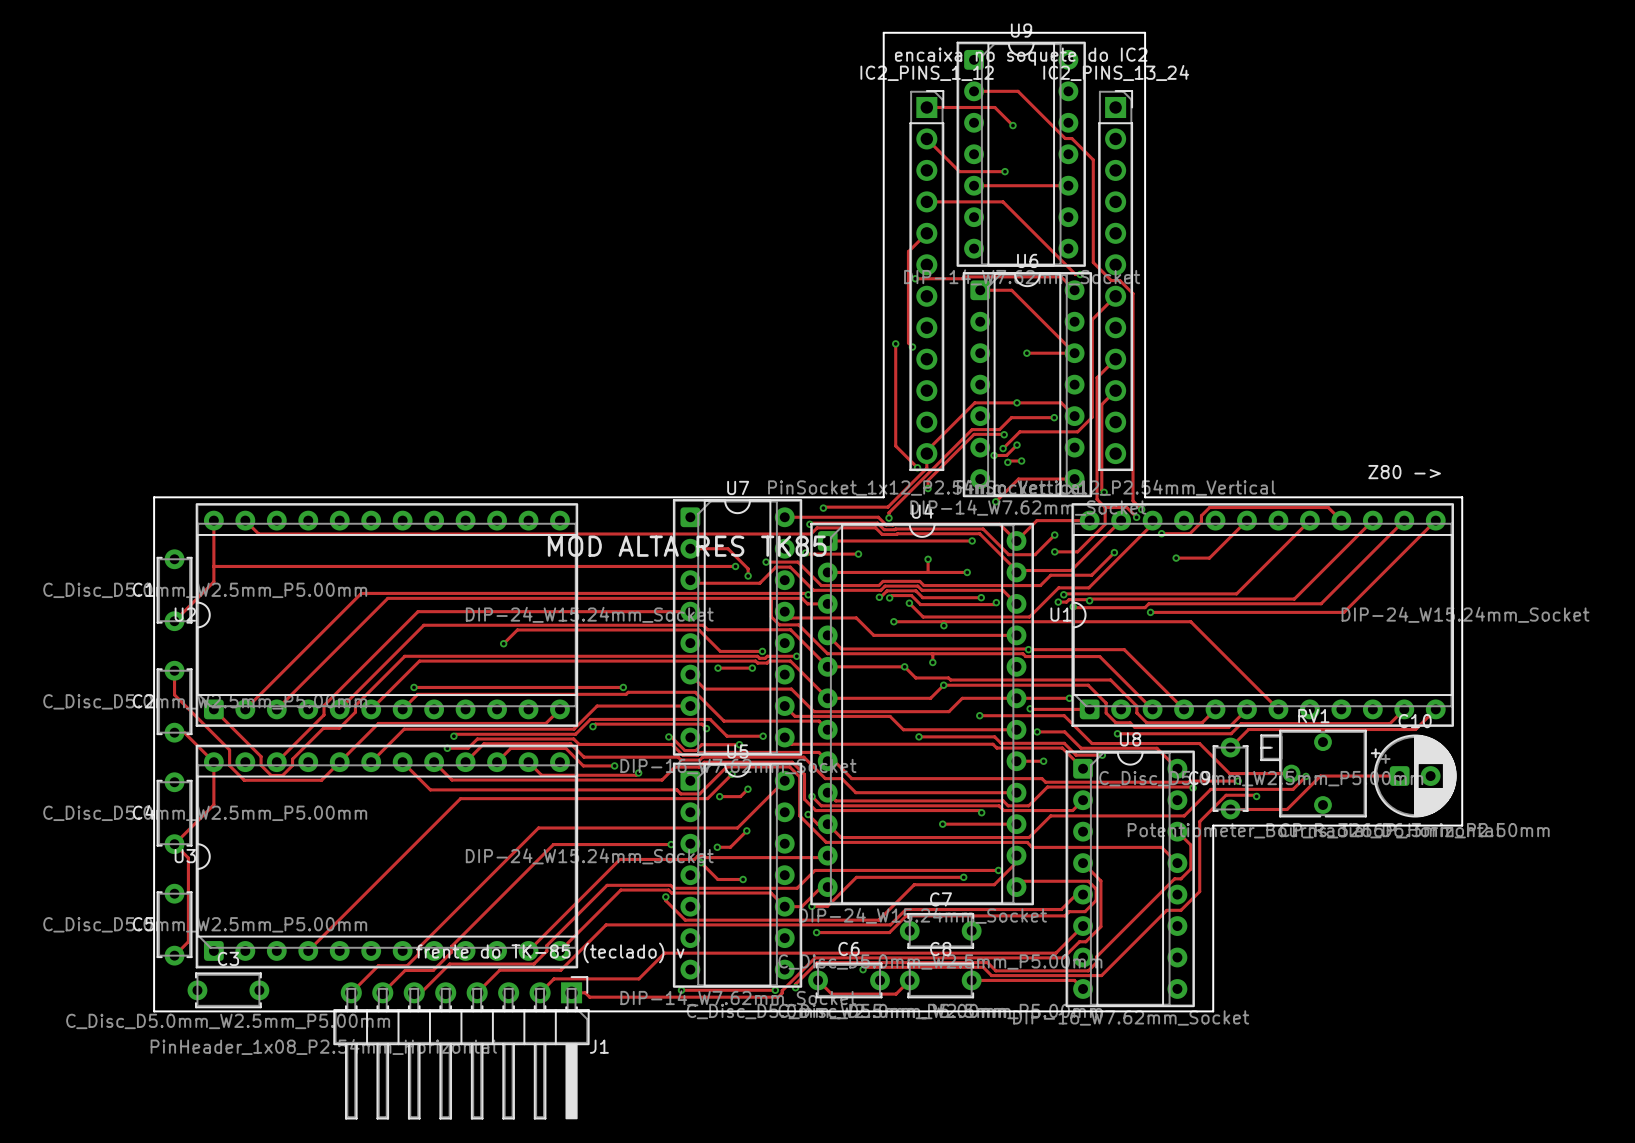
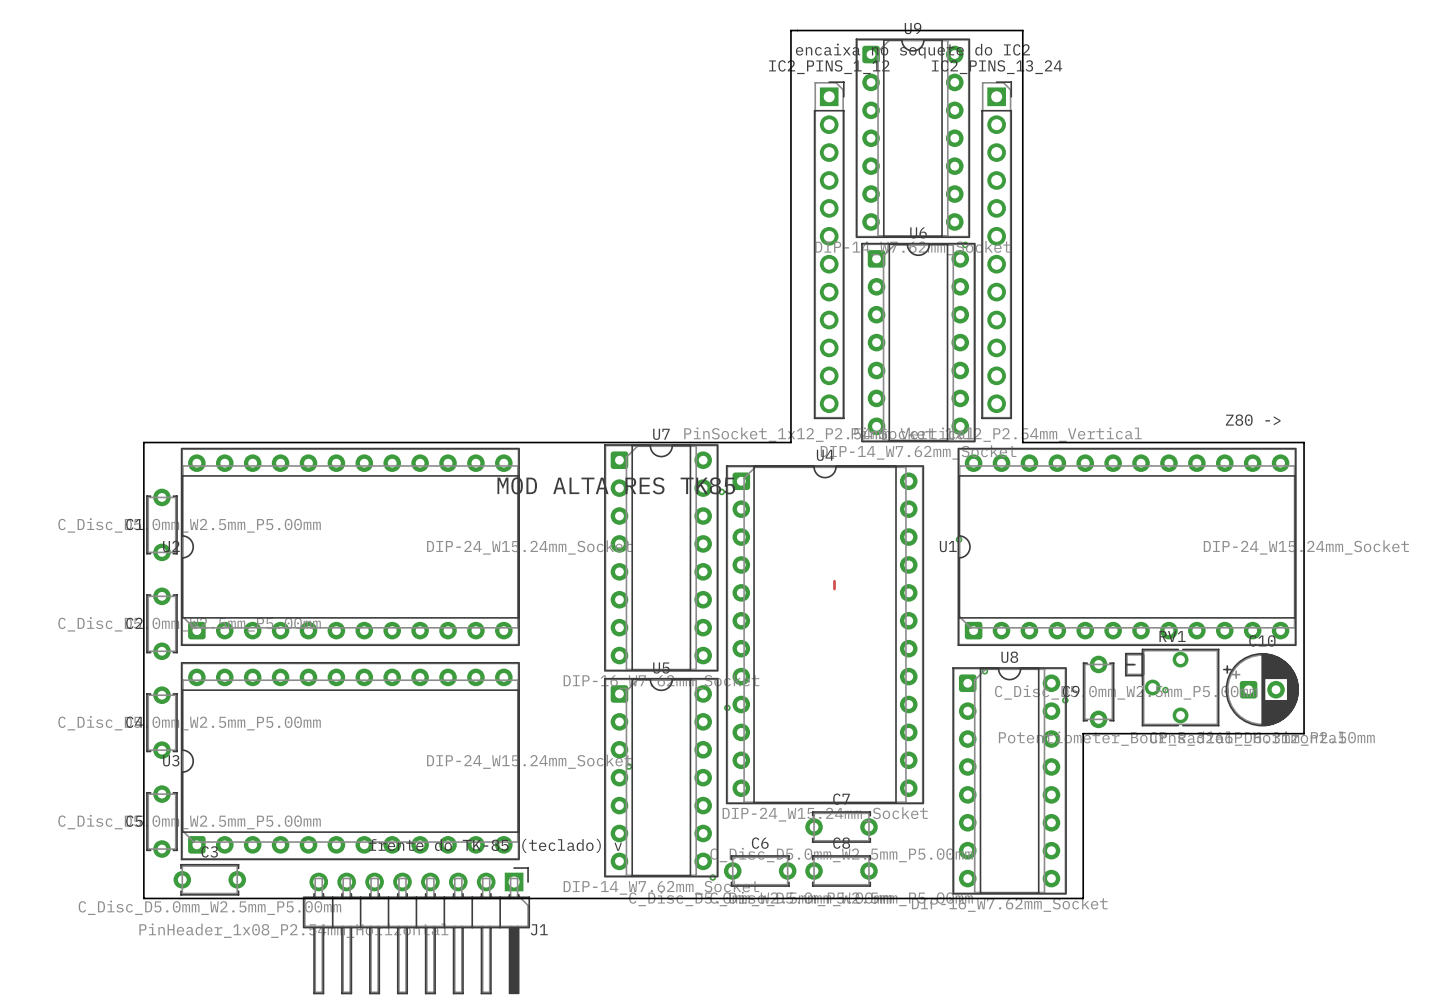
track: (974, 91) (1018, 91) (1065, 138) (1071, 138) (1093, 159) (1093, 262) (1111, 280) (1119, 280) (1133, 293) (1133, 500) (1141, 509) -> none
track: (926, 107) (994, 107) (1012, 125) -> none
via: (1012, 125) -> none
track: (926, 138) (959, 171) (1005, 171) -> none
via: (1005, 171) -> none
track: (974, 185) (1068, 185) -> none
track: (926, 201) (1003, 201) (1075, 274) (1080, 274) -> none
track: (926, 233) (908, 251) (908, 343) (912, 347) -> none
track: (915, 278) (1061, 276) (1074, 290) -> none
via: (915, 278) -> none
track: (980, 290) (1011, 290) (1074, 353) (1026, 353) -> none
track: (1115, 296) (1092, 319) (1092, 417) (1077, 431) (1019, 431) (1003, 448) -> none
track: (895, 343) (895, 445) (917, 467) -> none
via: (895, 343) -> none
via: (912, 347) -> none
via: (1026, 353) -> none
track: (1115, 359) (1097, 377) (1097, 499) (1105, 507) -> none
track: (1115, 390) (1101, 404) (1101, 489) (1104, 492) -> none
via: (1016, 402) -> none
track: (1074, 416) (1061, 402) (974, 402) (926, 450) (926, 468) (887, 507) (822, 507) -> none
track: (1054, 417) (1011, 417) (999, 429) (972, 429) (889, 512) (889, 518) -> none
via: (1054, 417) -> none
track: (1004, 434) (974, 434) (928, 480) (928, 488) -> none
via: (1004, 434) -> none
track: (1017, 445) (1006, 455) (994, 455) -> none
via: (1017, 445) -> none
via: (1003, 448) -> none
via: (994, 455) -> none
track: (1021, 461) (1007, 462) -> none
via: (1021, 461) -> none
via: (1007, 462) -> none
via: (917, 467) -> none
track: (1074, 479) (1018, 479) (995, 501) -> none
via: (928, 488) -> none
via: (1104, 492) -> none
via: (995, 501) -> none
track: (1105, 507) (1126, 507) (1136, 517) -> none
track: (1105, 507) (1105, 524) (1077, 551) (1054, 551) -> none
via: (823, 508) -> none
via: (1141, 509) -> none
track: (784, 517) (878, 517) (886, 525) (999, 524) (1016, 540) (1036, 520) (1089, 520) -> none
via: (1136, 517) -> none
via: (889, 518) -> none
track: (213, 520) (213, 581) (174, 621) -> none
track: (245, 520) (258, 534) (811, 534) (817, 527) (875, 527) (882, 534) (979, 533) (1016, 570) -> none
track: (1121, 520) (1071, 570) (1016, 570) -> none
track: (1152, 520) (1152, 524) (1088, 587) (1058, 587) (1029, 617) (923, 617) (909, 603) -> none
track: (1246, 520) (1209, 558) (1176, 558) -> none
track: (1309, 520) (1236, 593) (1063, 594) -> none
track: (1341, 520) (1328, 507) (1209, 507) (1201, 515) (1201, 522) (1189, 533) (1161, 533) -> none
track: (1372, 520) (1294, 599) (1089, 599) -> none
track: (1404, 520) (1321, 603) (1148, 603) (1144, 607) (1073, 606) -> none
track: (1435, 520) (1343, 612) (1150, 612) -> none
track: (809, 524) (877, 523) (884, 529) (983, 529) (1008, 554) (1035, 554) (1054, 535) -> none
via: (809, 524) -> none
via: (1161, 533) -> none
via: (1054, 535) -> none
track: (827, 540) (972, 540) -> none
via: (972, 540) -> none
track: (690, 548) (728, 548) (748, 568) (748, 576) -> none
via: (1054, 551) -> none
track: (1114, 552) (1091, 575) (1050, 575) (1040, 585) (923, 585) (919, 581) (883, 581) (878, 585) (821, 585) (797, 562) (766, 562) -> none
via: (1114, 552) -> none
track: (805, 553) (858, 554) -> none
via: (858, 554) -> none
via: (1176, 558) -> none
track: (928, 559) (928, 572) -> none
via: (928, 559) -> none
via: (766, 562) -> none
track: (213, 566) (735, 566) -> none
via: (735, 566) -> none
track: (827, 572) (967, 572) -> none
via: (967, 572) -> none
via: (748, 576) -> none
track: (690, 580) (693, 583) (759, 583) (775, 567) (790, 567) (813, 590) (880, 590) (885, 586) (917, 586) (922, 590) (1002, 590) (1016, 603) -> none
track: (808, 594) (361, 593) (245, 709) -> none
via: (808, 594) -> none
via: (1063, 594) -> none
track: (879, 597) (887, 590) (915, 590) (922, 597) (981, 597) -> none
via: (879, 597) -> none
track: (889, 597) (892, 595) (911, 595) (920, 604) (994, 604) (996, 602) -> none
via: (889, 597) -> none
via: (981, 597) -> none
track: (771, 598) (771, 616) (779, 624) (798, 624) (827, 653) (1022, 653) (1025, 656) (1099, 656) (1152, 709) -> none
track: (1089, 599) (1069, 599) (1066, 602) (1058, 602) -> none
via: (1089, 600) -> none
via: (996, 602) -> none
via: (1058, 602) -> none
track: (827, 603) (807, 603) (802, 598) (387, 598) (276, 709) -> none
via: (909, 603) -> none
track: (690, 611) (417, 611) (324, 705) (324, 714) (276, 762) -> none
track: (784, 611) (791, 617) (856, 617) (873, 635) (1016, 635) -> none
via: (1150, 612) -> none
track: (893, 621) (1190, 621) (1278, 709) -> none
via: (893, 621) -> none
via: (943, 625) -> none
track: (827, 635) (841, 649) (1124, 649) (1184, 709) -> none
track: (503, 643) (517, 629) (698, 629) (720, 651) (762, 651) -> none
via: (503, 643) -> none
via: (1028, 649) -> none
via: (762, 651) -> none
track: (796, 656) (767, 656) (765, 658) (757, 656) (404, 656) (355, 705) (355, 712) (339, 728) (323, 728) (292, 759) (292, 765) (282, 775) (271, 775) (261, 765) (261, 756) (213, 709) -> none
via: (796, 656) -> none
via: (932, 662) -> none
via: (904, 666) -> none
track: (718, 668) (752, 668) -> none
via: (718, 668) -> none
via: (752, 668) -> none
track: (174, 670) (174, 694) (229, 750) (229, 765) (244, 780) (321, 780) (378, 723) (545, 723) (559, 709) -> none
track: (690, 674) (704, 689) (791, 689) (814, 711) (948, 711) (962, 698) (1069, 698) -> none
via: (943, 685) -> none
track: (414, 687) (623, 687) -> none
via: (414, 687) -> none
via: (623, 687) -> none
via: (1069, 698) -> none
track: (690, 706) (597, 706) (574, 729) (404, 729) (371, 762) -> none
track: (784, 706) (795, 716) (890, 716) (903, 729) (1016, 729) -> none
track: (1030, 708) (1089, 709) -> none
via: (1030, 708) -> none
track: (339, 709) (423, 625) (703, 625) (707, 629) (790, 629) (827, 666) (904, 666) (915, 677) (948, 677) (950, 680) (1110, 680) (1136, 706) (1136, 712) (1146, 722) (1202, 722) (1215, 709) -> none
track: (371, 709) (419, 661) (755, 661) (757, 663) (790, 661) (827, 698) (930, 698) (943, 685) (1088, 685) (1106, 703) (1106, 713) (1115, 722) (1130, 722) (1134, 727) (1228, 727) (1246, 709) -> none
track: (402, 709) (417, 694) (626, 694) (628, 692) (695, 692) (724, 721) (819, 721) (827, 729) -> none
track: (1404, 709) (1390, 723) (1241, 723) (1231, 733) (1117, 733) -> none
track: (1435, 709) (1415, 729) (1248, 729) (1230, 747) -> none
track: (979, 715) (1064, 715) (1092, 743) (1199, 743) (1229, 773) (1291, 773) -> none
via: (979, 715) -> none
track: (592, 726) (595, 724) (702, 724) (706, 728) -> none
via: (592, 726) -> none
via: (706, 728) -> none
track: (1037, 731) (1064, 731) (1081, 748) (1156, 748) (1177, 768) -> none
via: (1037, 731) -> none
track: (174, 732) (184, 732) (213, 762) (213, 804) (174, 844) (188, 858) (188, 941) (174, 955) -> none
via: (1117, 733) -> none
track: (453, 736) (455, 734) (575, 734) (590, 719) (710, 719) (727, 736) (763, 736) -> none
via: (453, 736) -> none
track: (668, 736) (671, 736) (684, 750) (695, 750) (701, 744) (739, 744) -> none
via: (668, 736) -> none
via: (763, 736) -> none
track: (918, 736) (994, 736) (1001, 743) (1064, 743) (1076, 755) (1102, 755) -> none
via: (918, 736) -> none
track: (784, 737) (791, 744) (993, 744) (996, 748) (1062, 748) (1083, 768) -> none
via: (739, 744) -> none
track: (447, 748) (468, 748) (477, 739) (573, 739) (579, 744) (672, 744) (682, 755) (697, 755) (700, 752) (818, 752) (827, 761) (834, 761) (851, 778) (1041, 778) (1045, 782) (1238, 781) -> none
via: (447, 748) -> none
track: (1016, 761) (1043, 761) -> none
via: (1043, 761) -> none
track: (402, 762) (430, 789) (676, 789) (680, 793) (699, 793) (726, 766) (789, 766) (799, 776) (799, 815) (826, 842) (1027, 842) (1032, 847) (1161, 847) (1177, 863) -> none
track: (434, 762) (451, 780) (662, 780) (674, 767) (699, 767) (704, 762) (792, 762) (804, 774) (804, 799) (815, 810) (979, 810) (981, 812) -> none
track: (465, 762) (484, 743) (570, 743) (584, 757) (678, 757) (681, 760) (699, 760) (702, 757) (803, 757) (825, 778) (841, 778) (855, 792) (1016, 792) -> none
track: (497, 762) (510, 748) (565, 748) (583, 765) (614, 765) -> none
track: (528, 762) (541, 775) (636, 775) (638, 773) -> none
via: (614, 765) -> none
via: (638, 773) -> none
track: (732, 774) (707, 798) (460, 798) (308, 950) -> none
via: (732, 774) -> none
track: (1305, 776) (1293, 789) (1210, 789) (1184, 815) (1050, 815) (1029, 837) (841, 837) (827, 824) (817, 824) (808, 814) -> none
track: (1399, 776) (1320, 776) (1287, 809) (1230, 809) -> none
track: (784, 780) (737, 828) (538, 828) (418, 948) (418, 954) (407, 965) (378, 965) (351, 992) -> none
via: (1238, 781) -> none
track: (1193, 787) (1047, 787) (1028, 805) (1008, 805) (1003, 800) (835, 800) (827, 792) -> none
track: (747, 789) (740, 796) (719, 796) -> none
via: (747, 789) -> none
via: (719, 796) -> none
track: (812, 796) (821, 805) (999, 805) (1003, 810) (1072, 810) (1083, 800) -> none
track: (1256, 796) (1226, 795) (1199, 821) (1199, 891) (1181, 910) (1166, 910) (1101, 975) (991, 975) (983, 967) (865, 967) (863, 969) -> none
via: (1256, 796) -> none
via: (981, 812) -> none
via: (808, 814) -> none
track: (942, 824) (1016, 824) -> none
via: (942, 824) -> none
track: (746, 830) (730, 847) (717, 847) -> none
via: (746, 830) -> none
track: (1177, 831) (1190, 845) (1190, 869) (1181, 878) (1174, 878) (1096, 956) (1096, 962) (1088, 970) (995, 970) (987, 962) (817, 962) (795, 984) (795, 987) -> none
track: (671, 844) (553, 844) (451, 946) (451, 952) (433, 970) (405, 970) (382, 992) -> none
via: (671, 844) -> none
via: (717, 847) -> none
track: (827, 855) (825, 857) (705, 857) (698, 855) (694, 859) (620, 859) (528, 950) -> none
track: (1016, 855) (1016, 862) (994, 884) (914, 884) (878, 920) (685, 920) (665, 900) (665, 896) -> none
track: (701, 862) (717, 879) (743, 879) -> none
track: (1083, 863) (1100, 880) (1100, 926) (1085, 941) (1079, 941) (1063, 957) (815, 957) (778, 997) (589, 997) (585, 992) (571, 992) -> none
track: (998, 870) (814, 870) (797, 888) (673, 888) (670, 885) (607, 885) (546, 945) (546, 951) (533, 964) (449, 964) (420, 992) (414, 992) -> none
via: (998, 870) -> none
track: (963, 877) (856, 877) (827, 906) (811, 906) -> none
via: (963, 877) -> none
via: (743, 879) -> none
track: (827, 887) (821, 887) (801, 906) (784, 906) (771, 893) (671, 893) (668, 890) (620, 890) (559, 950) -> none
track: (1016, 887) (1022, 881) (1088, 881) (1096, 888) (1096, 900) (1085, 911) (1069, 911) (1065, 915) (906, 915) (889, 932) (816, 932) -> none
track: (1083, 894) (1076, 894) (1061, 909) (905, 909) (890, 924) (606, 924) (560, 970) (499, 970) (477, 992) -> none
via: (665, 896) -> none
via: (811, 906) -> none
track: (1083, 926) (1055, 953) (664, 953) (638, 978) (554, 978) (540, 992) -> none
via: (816, 932) -> none
via: (863, 969) -> none
track: (818, 980) (831, 994) (896, 994) (909, 980) -> none
track: (971, 980) (1074, 980) (1083, 988) -> none
track: (681, 990) (775, 990) -> none
via: (681, 990) -> none
via: (775, 990) -> none

